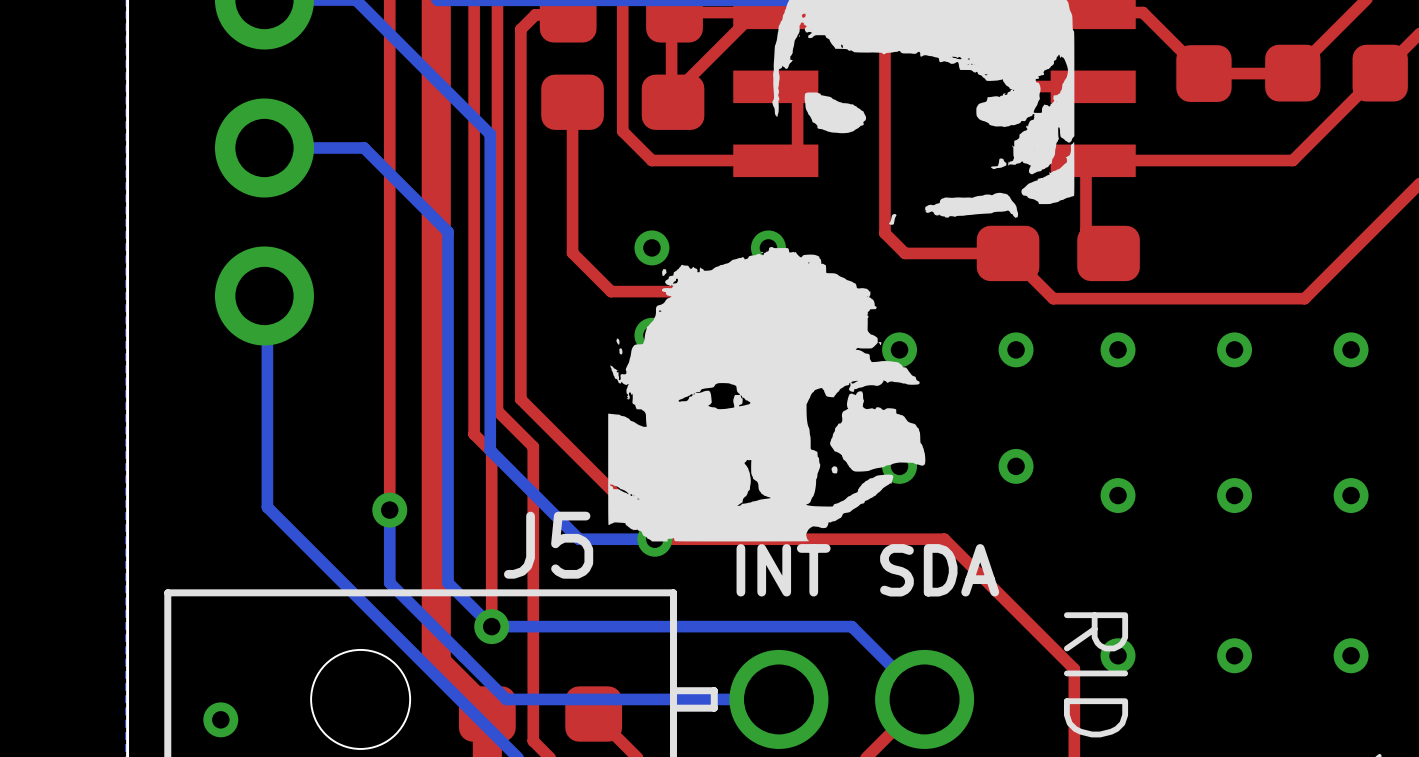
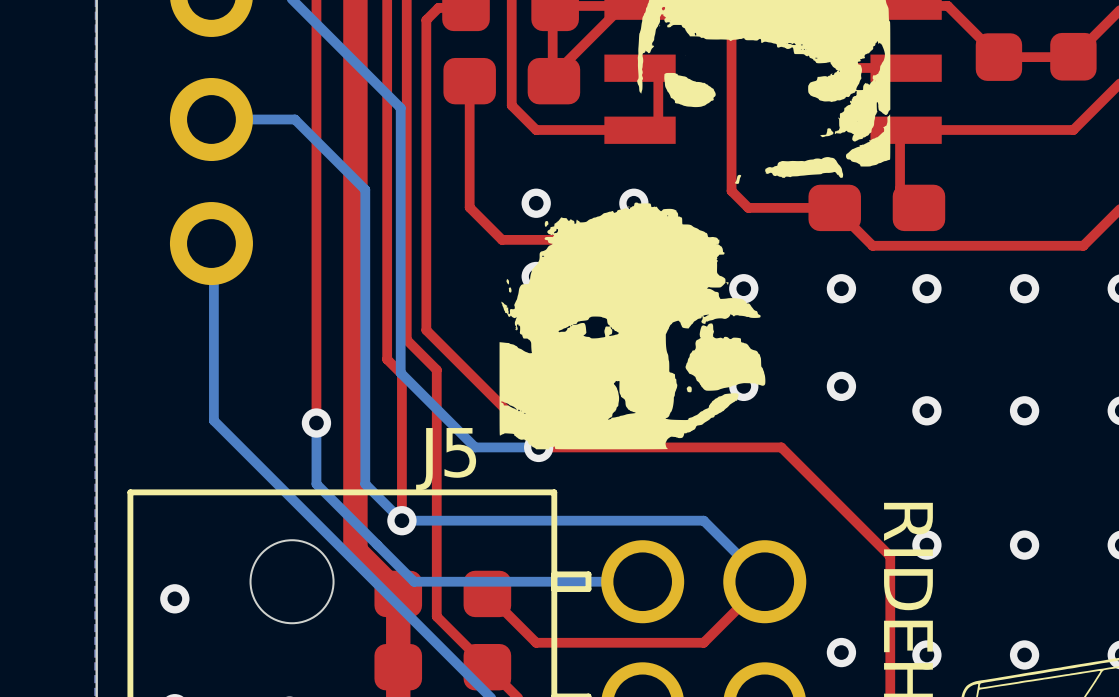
text: INT (783, 570) -> none
text: SDA (939, 570) -> none

